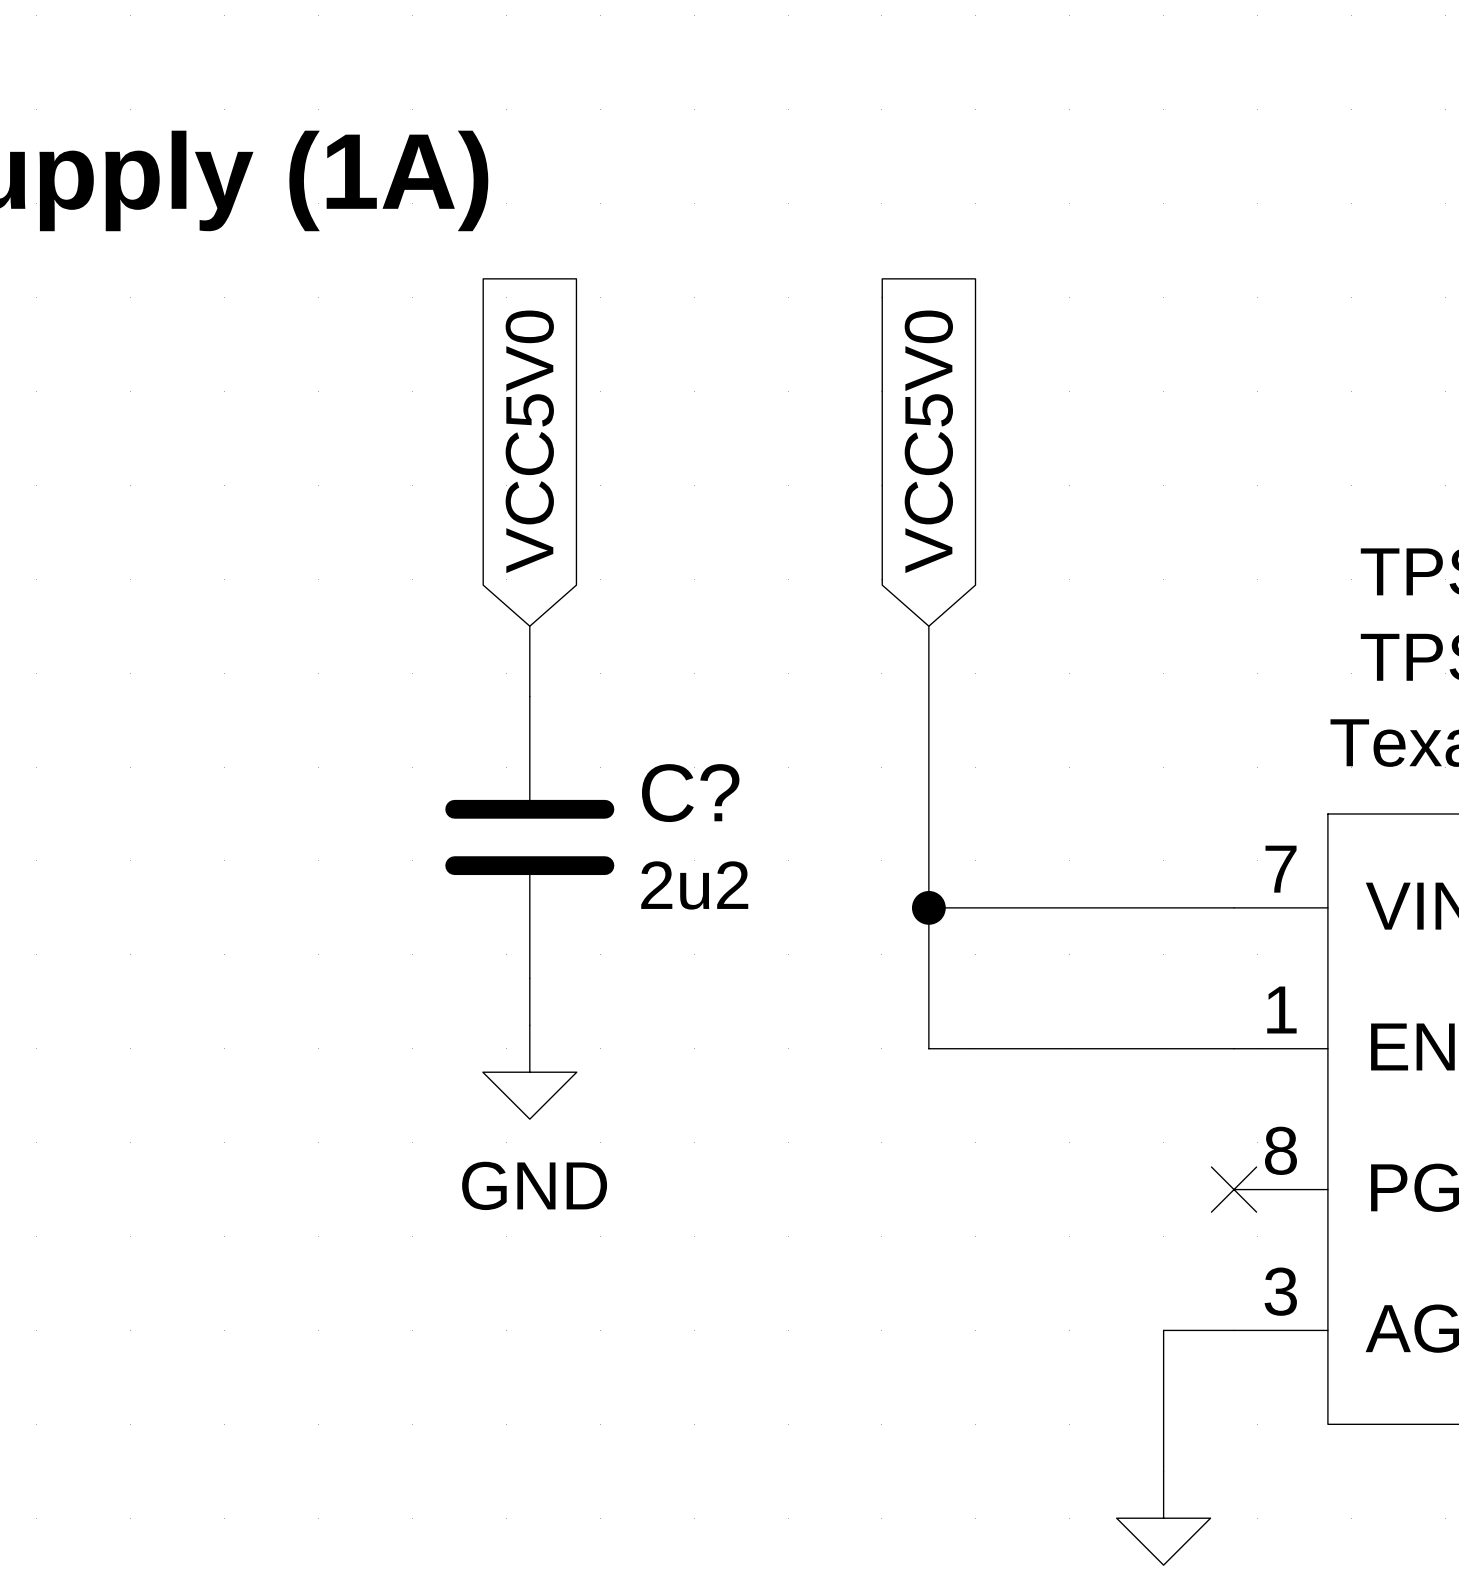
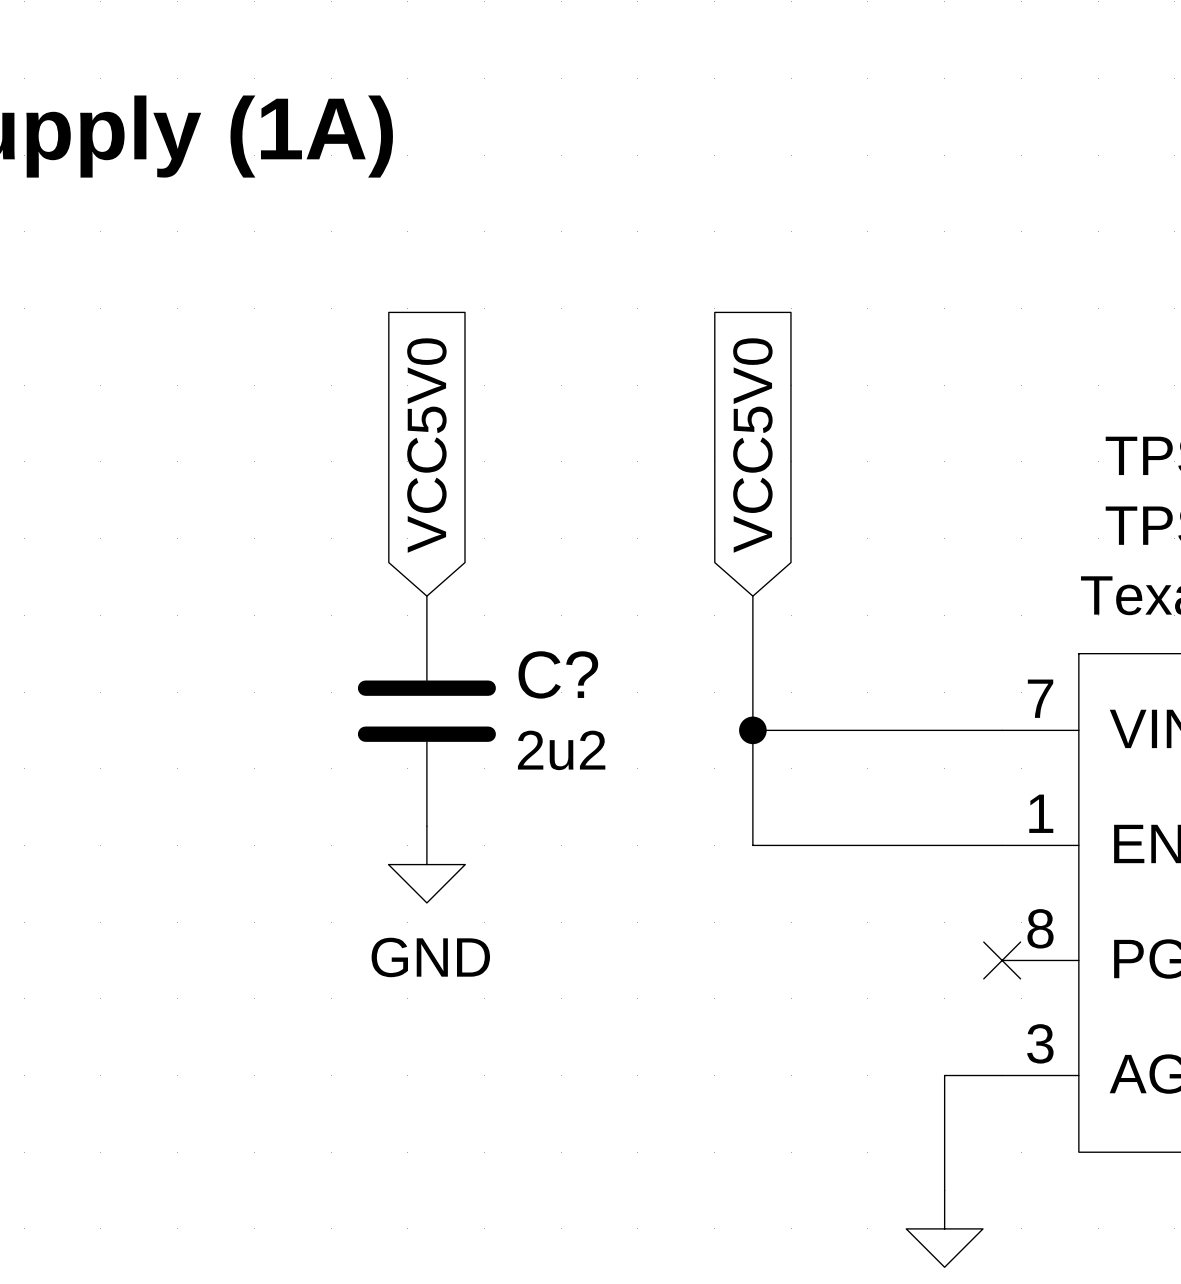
global label position: VCC5V0 (529, 441) -> VCC5V0 (426, 445)
global label position: VCC5V0 (928, 441) -> VCC5V0 (752, 445)
wire: (529, 626) (529, 696) -> none
wire: (928, 626) (928, 743) -> none
C? position: (529, 837) -> (426, 711)

